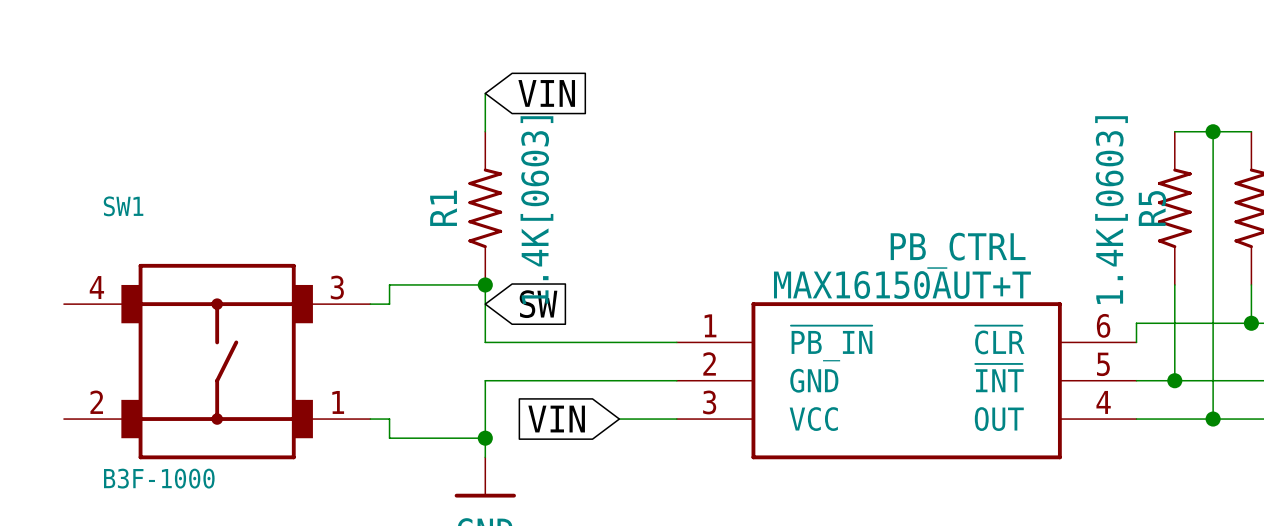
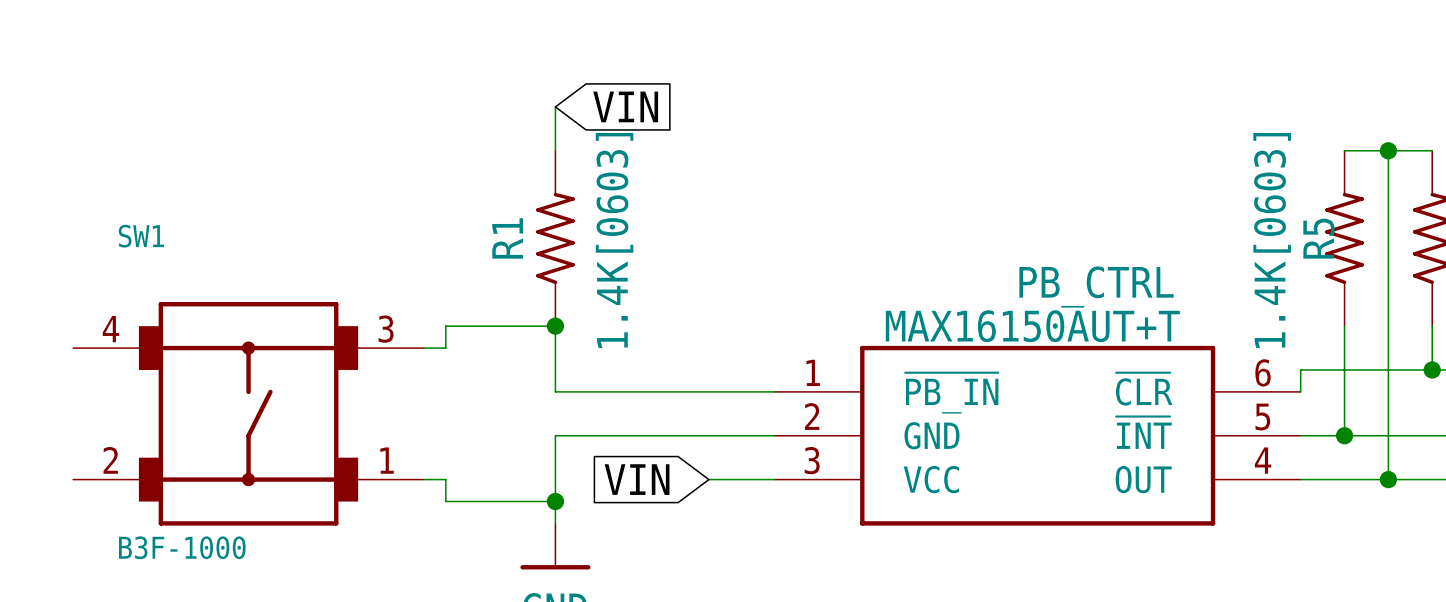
global label: SW (538, 304) -> none

